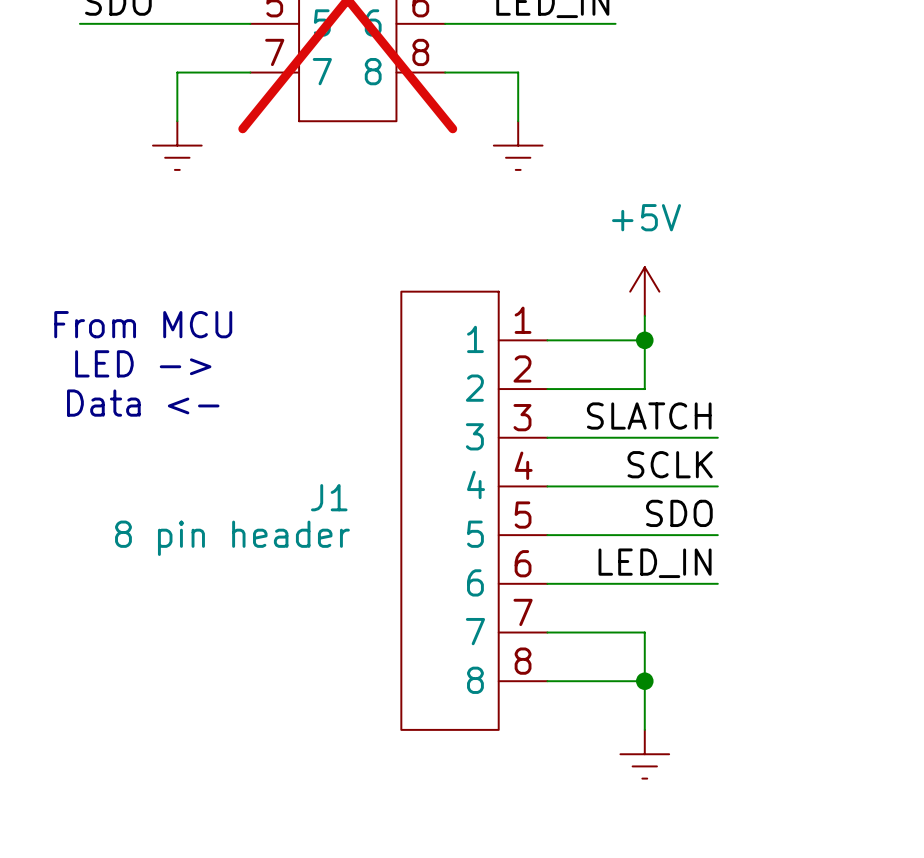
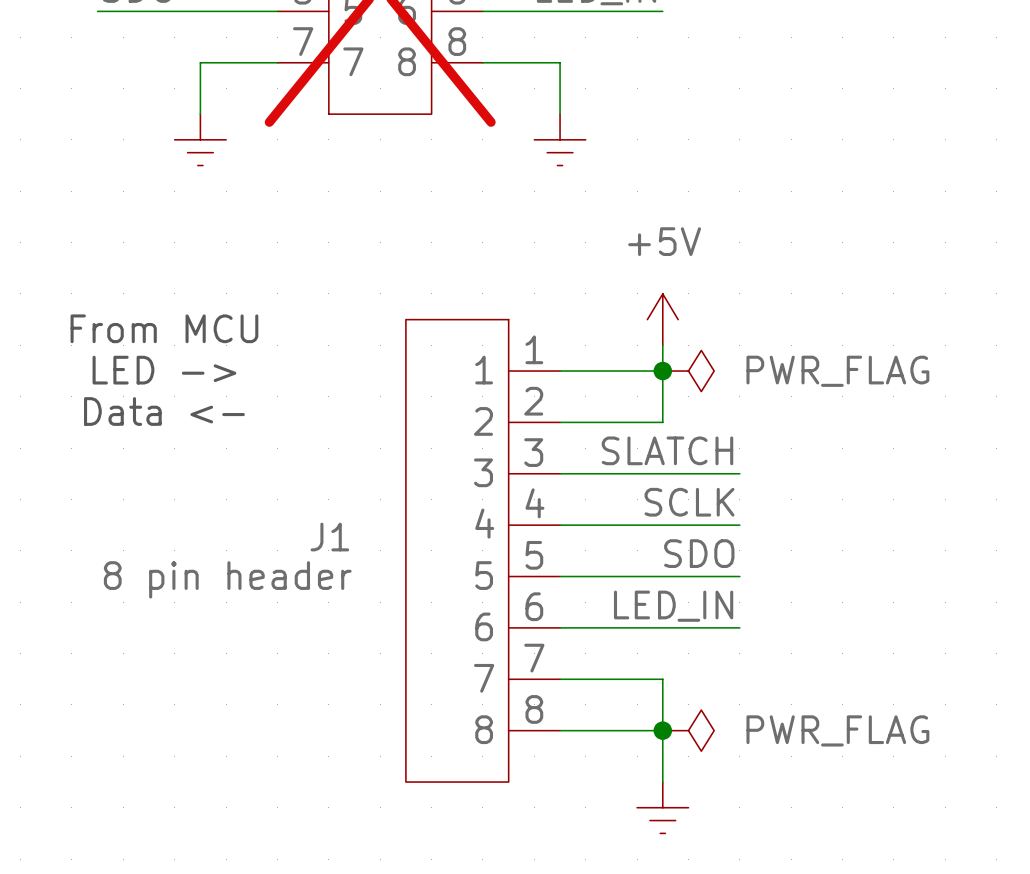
power symbol position: +5V (644, 291) -> +5V (662, 319)
wire: (644, 316) (644, 389) (547, 389) -> (662, 345) (662, 422) (560, 422)
wire: (547, 340) (644, 340) -> (560, 371) (662, 371)
junction position: (644, 340) -> (662, 371)
power symbol: none -> PWR_FLAG (688, 371)
label position: SLATCH (649, 416) -> SLATCH (667, 450)
wire: (547, 437) (717, 437) -> (560, 473) (739, 473)
label position: SCLK (670, 464) -> SCLK (689, 502)
wire: (547, 486) (717, 486) -> (560, 525) (739, 525)
J1 position: (474, 510) -> (482, 550)
label position: SDO (679, 513) -> SDO (699, 553)
wire: (547, 535) (717, 535) -> (560, 576) (739, 576)
label position: LED_IN (655, 563) -> LED_IN (673, 606)
wire: (547, 583) (717, 583) -> (560, 627) (739, 627)
wire: (547, 632) (644, 632) (644, 729) -> (560, 679) (662, 679) (662, 782)
wire: (547, 681) (644, 681) -> (560, 730) (662, 730)
junction position: (644, 681) -> (662, 730)
power symbol: none -> PWR_FLAG (688, 730)
power symbol position: (644, 754) -> (662, 807)

